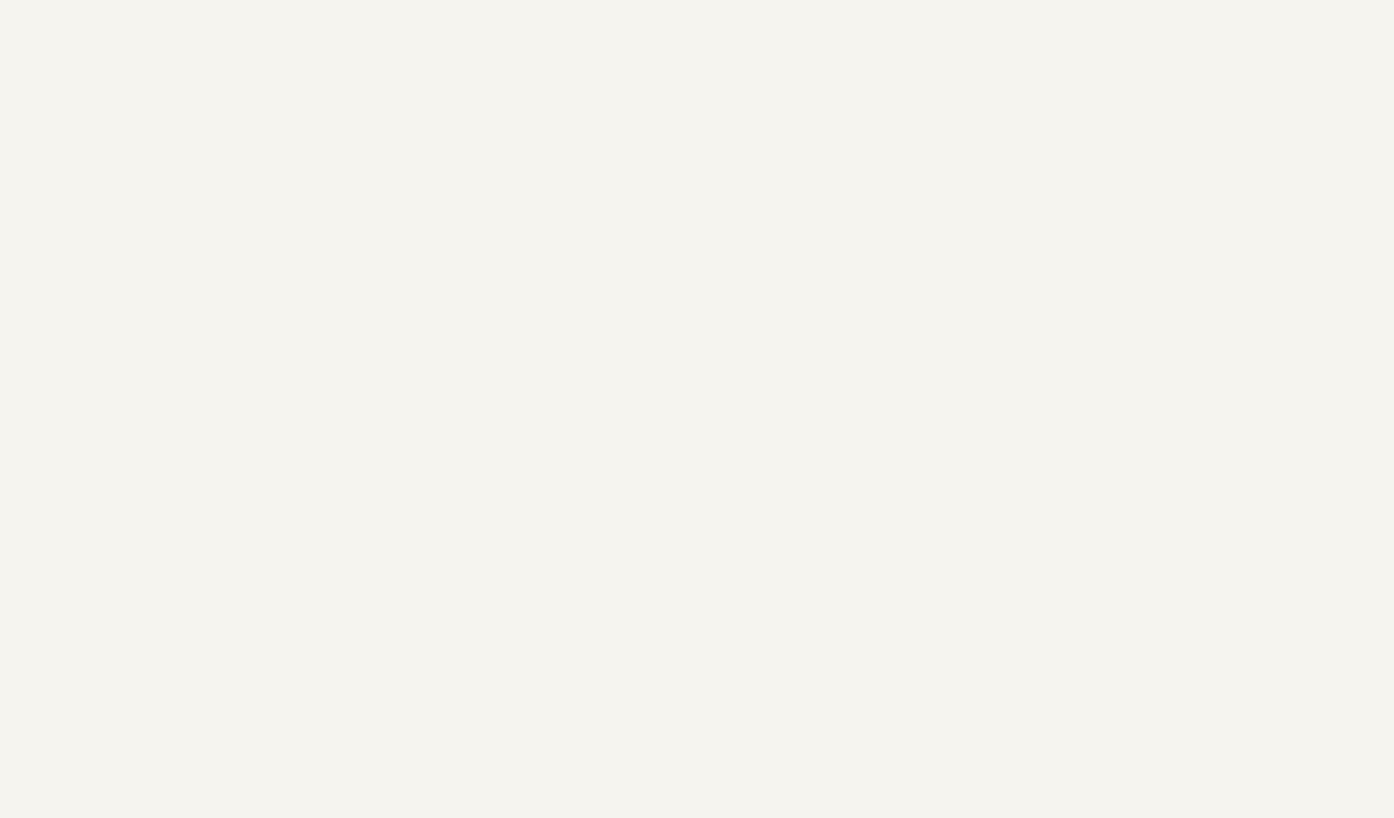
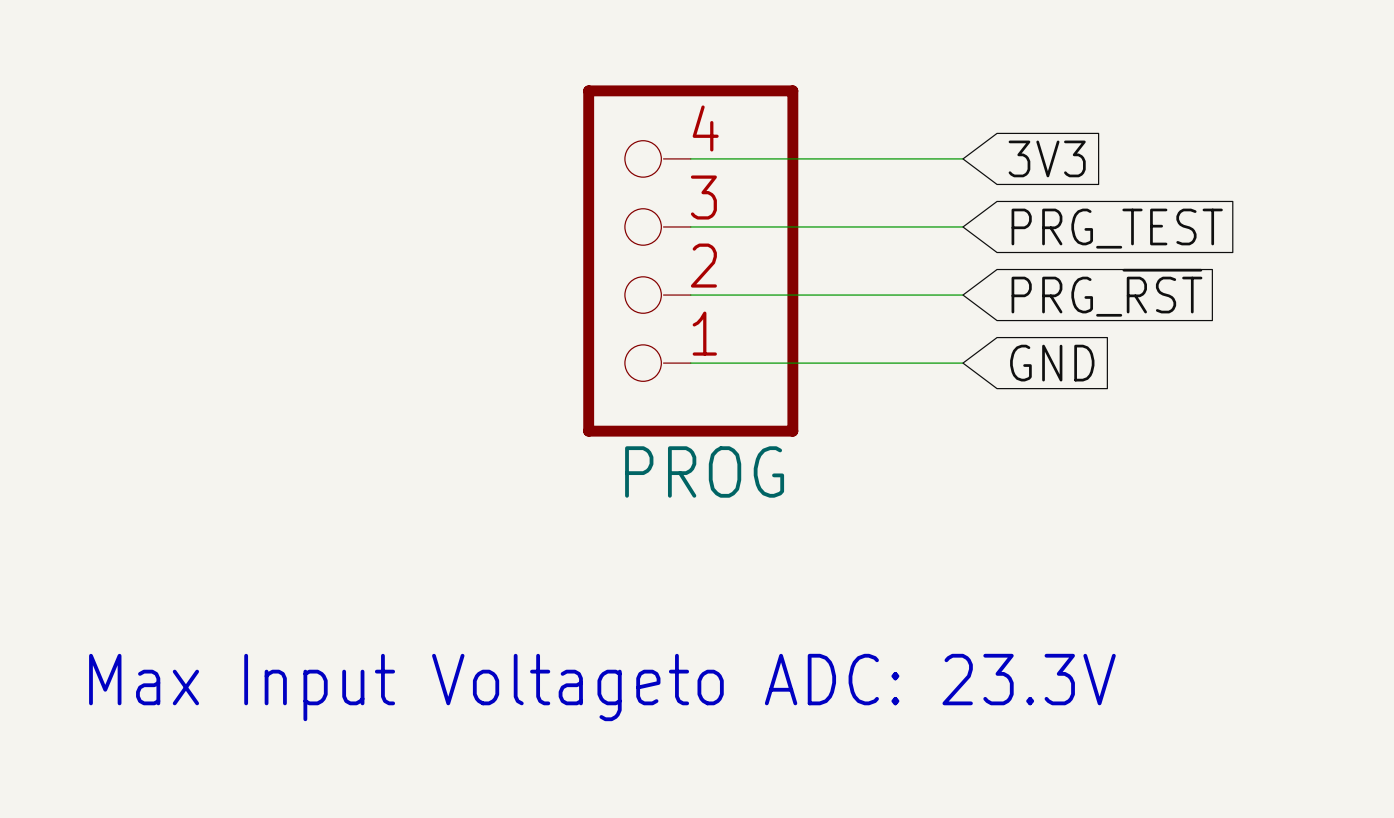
wire: none -> (690, 158) (962, 158)
global label: none -> 3V3 (1047, 158)
wire: none -> (690, 226) (962, 226)
global label: none -> PRG_TEST (1117, 228)
PROG: none -> (690, 261)
global label: none -> PRG_~{RST} (1106, 292)
wire: none -> (690, 295) (962, 295)
wire: none -> (690, 363) (962, 363)
global label: none -> GND (1052, 363)
text: none -> Max Input Voltageto ADC: 23.3V (602, 687)

